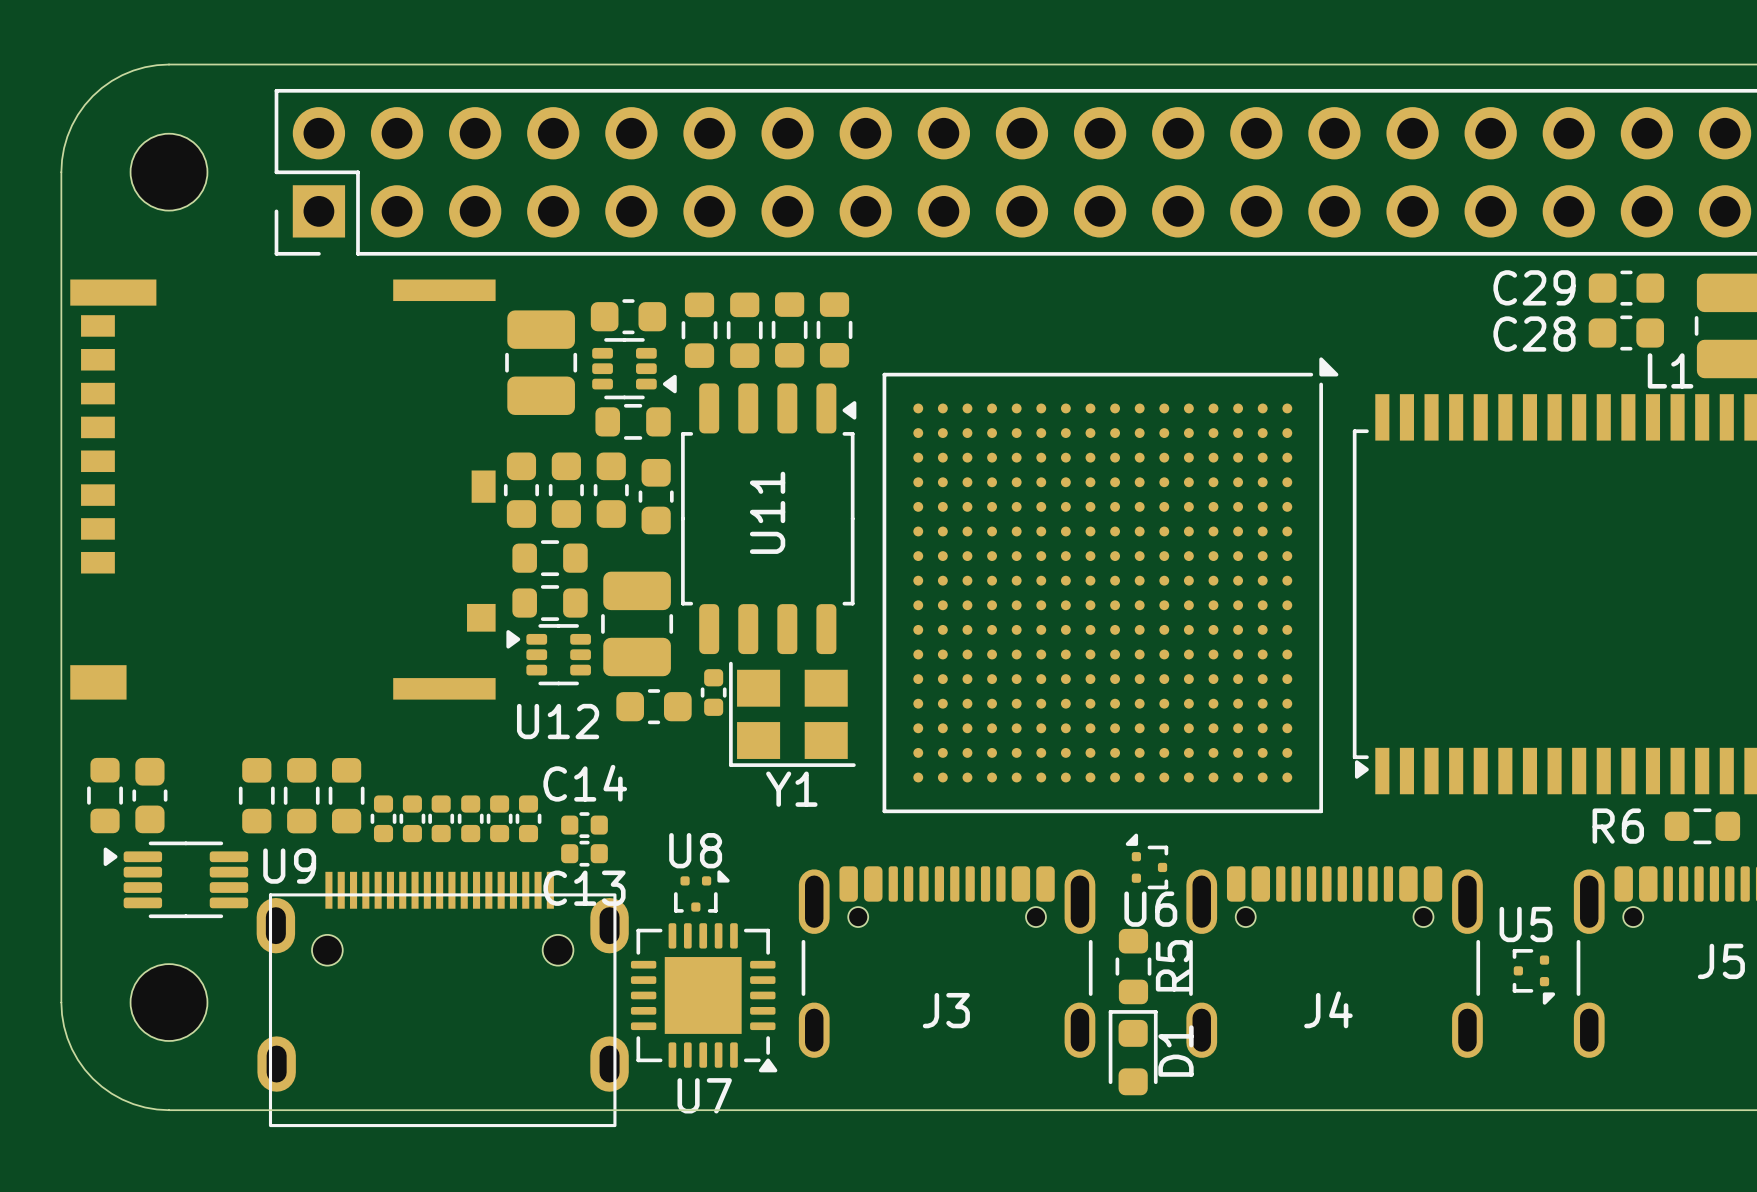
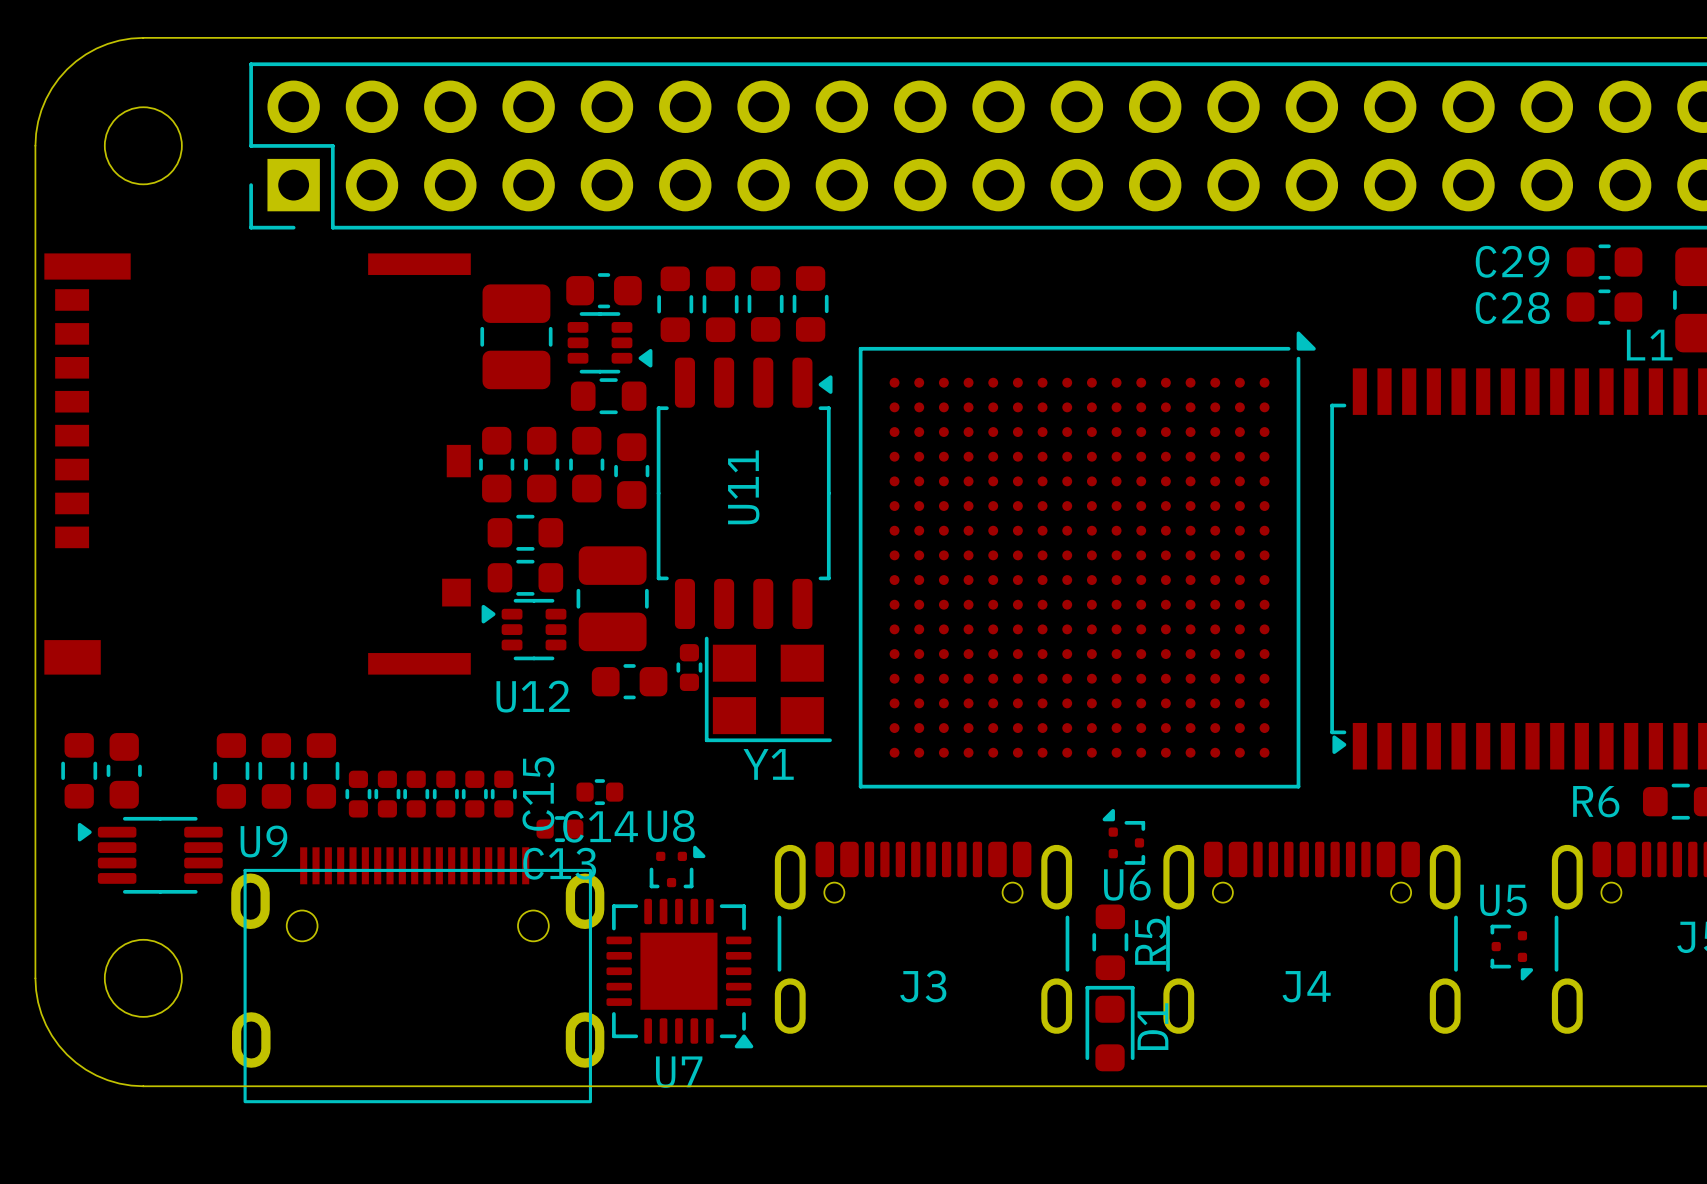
C14 name position: C14 (585, 783) -> C14 (600, 826)
C15 name: none -> C15 (538, 794)
C14 position: (584, 825) -> (599, 792)

